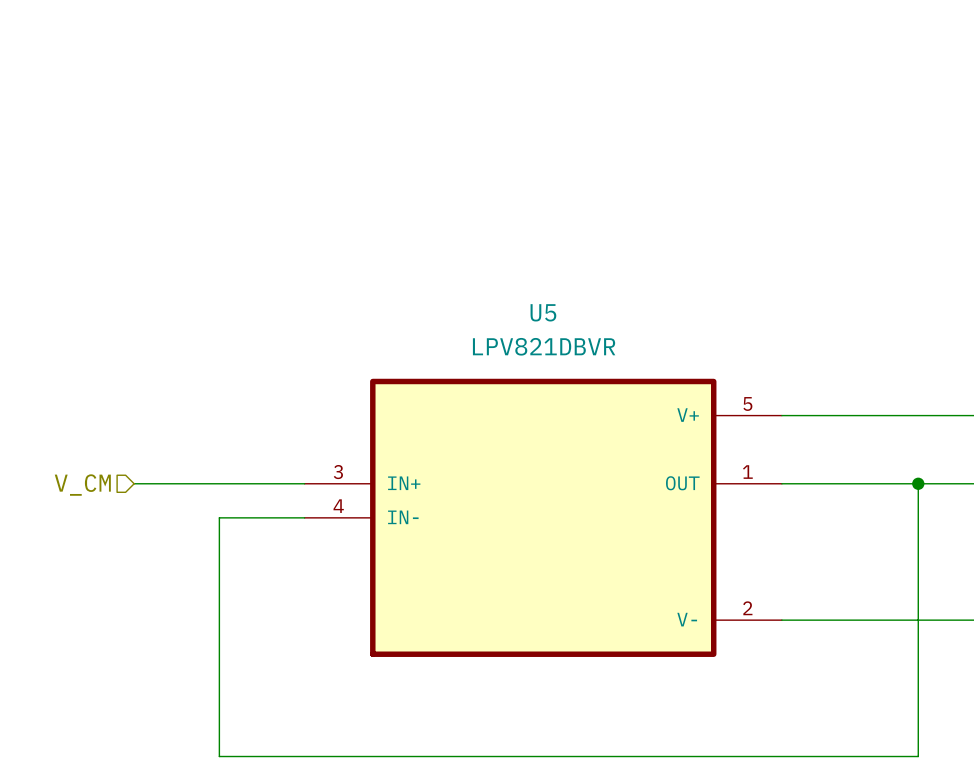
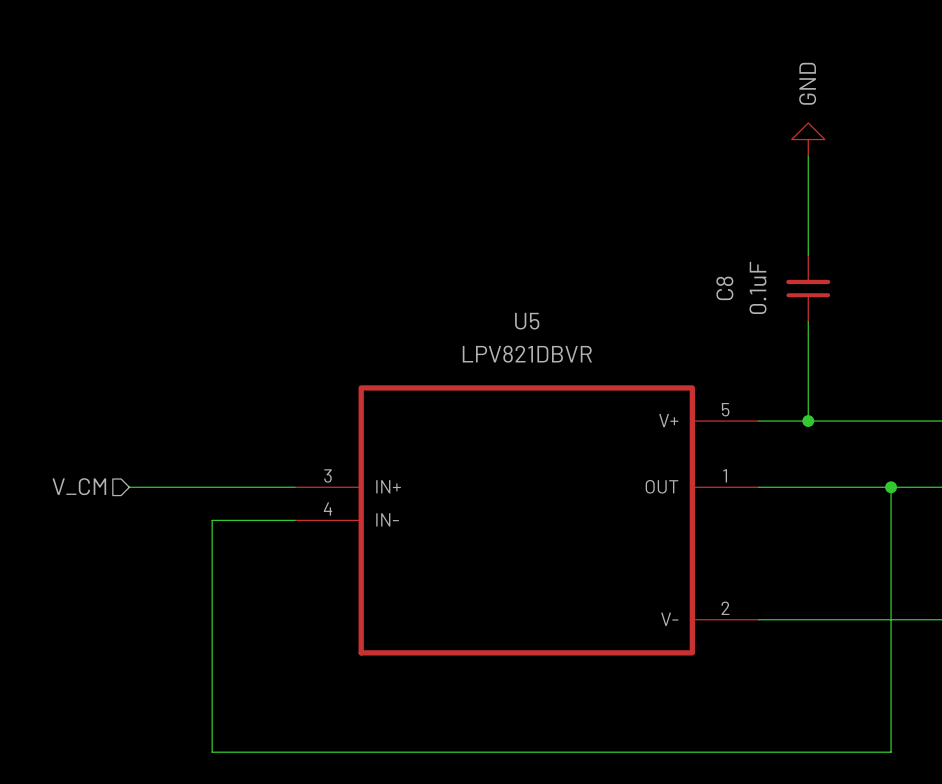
power symbol: none -> GND (808, 139)
wire: none -> (808, 156) (808, 255)
C8: none -> 0.1uF (808, 288)
wire: none -> (808, 321) (808, 421)
junction: none -> (808, 421)

